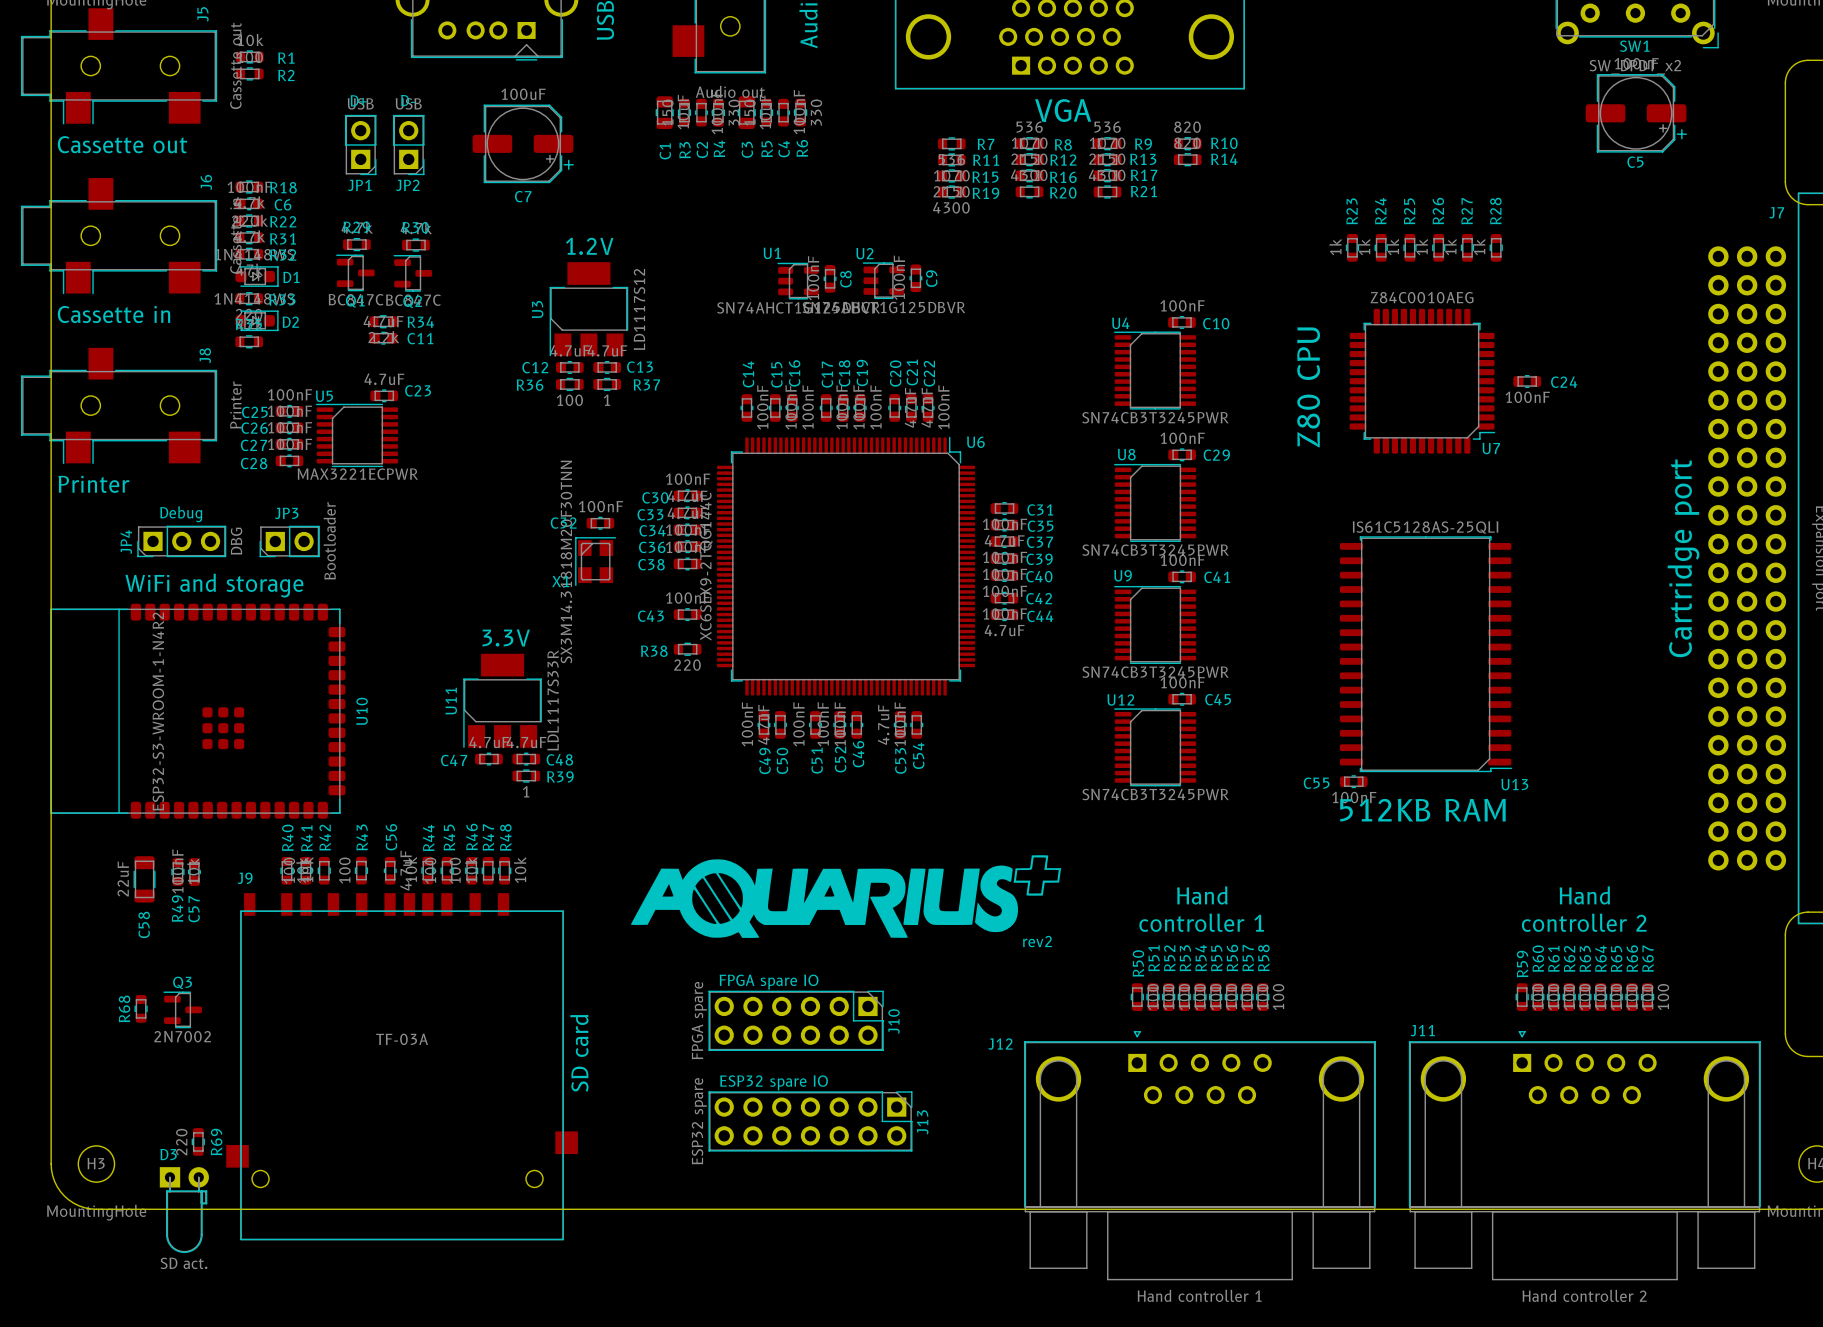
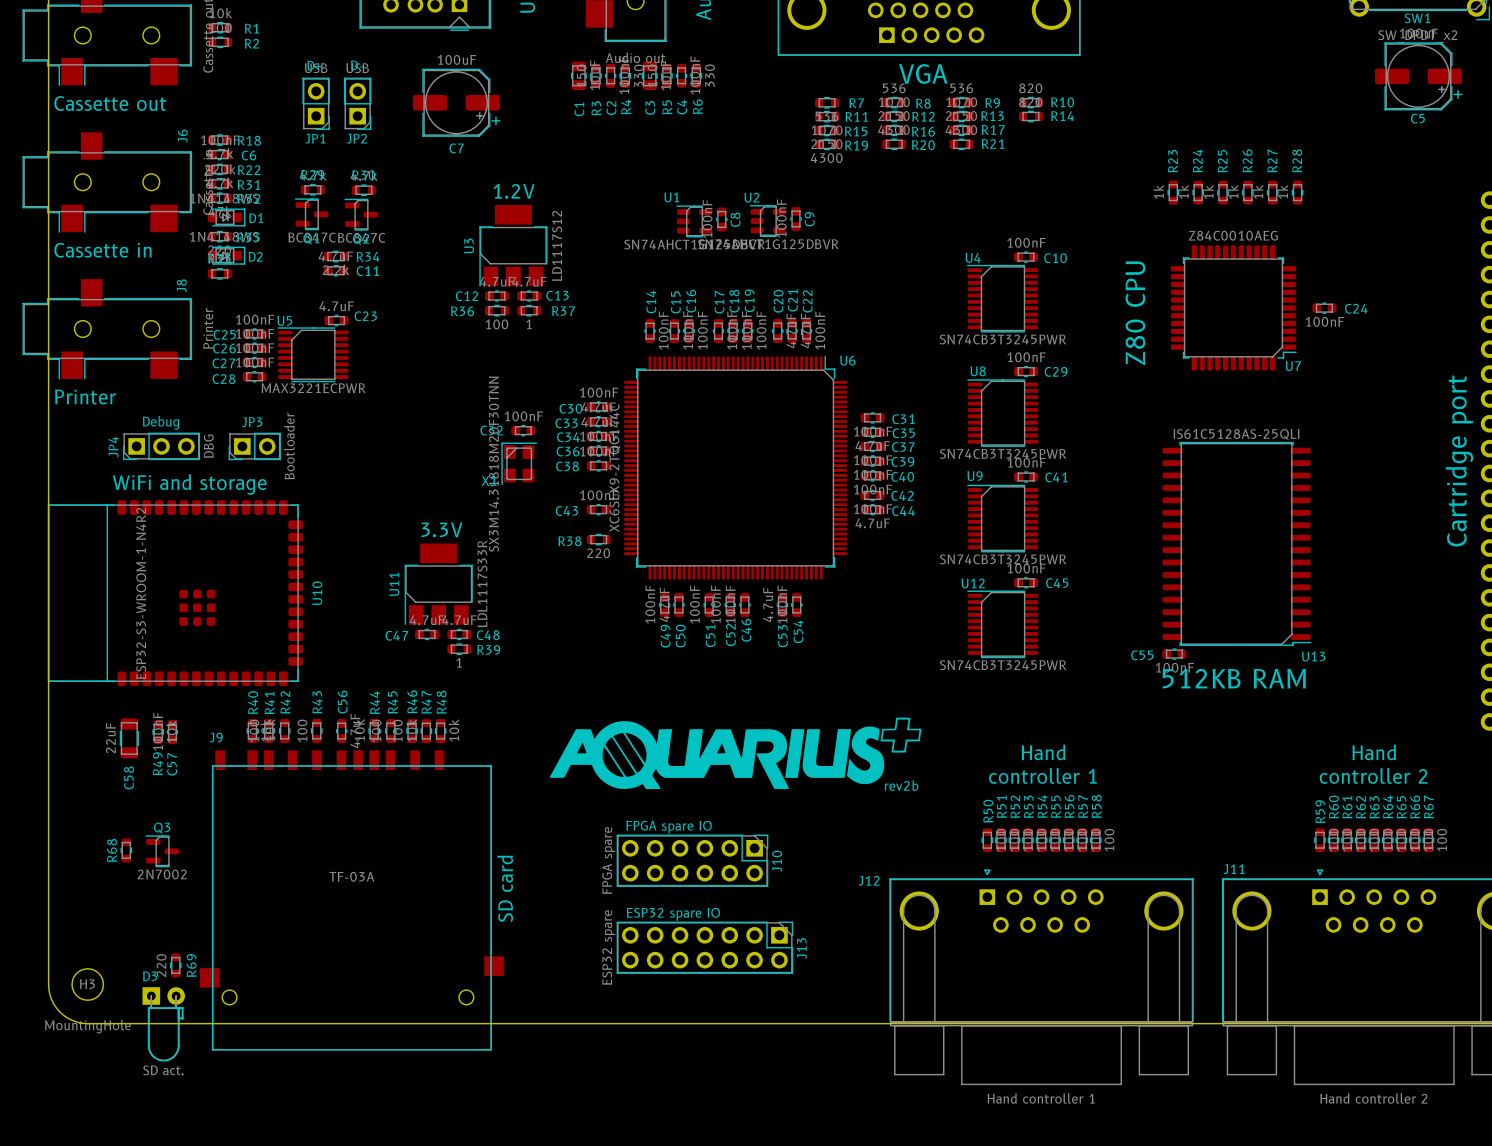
text: rev2 (1037, 941) -> rev2b (901, 785)

